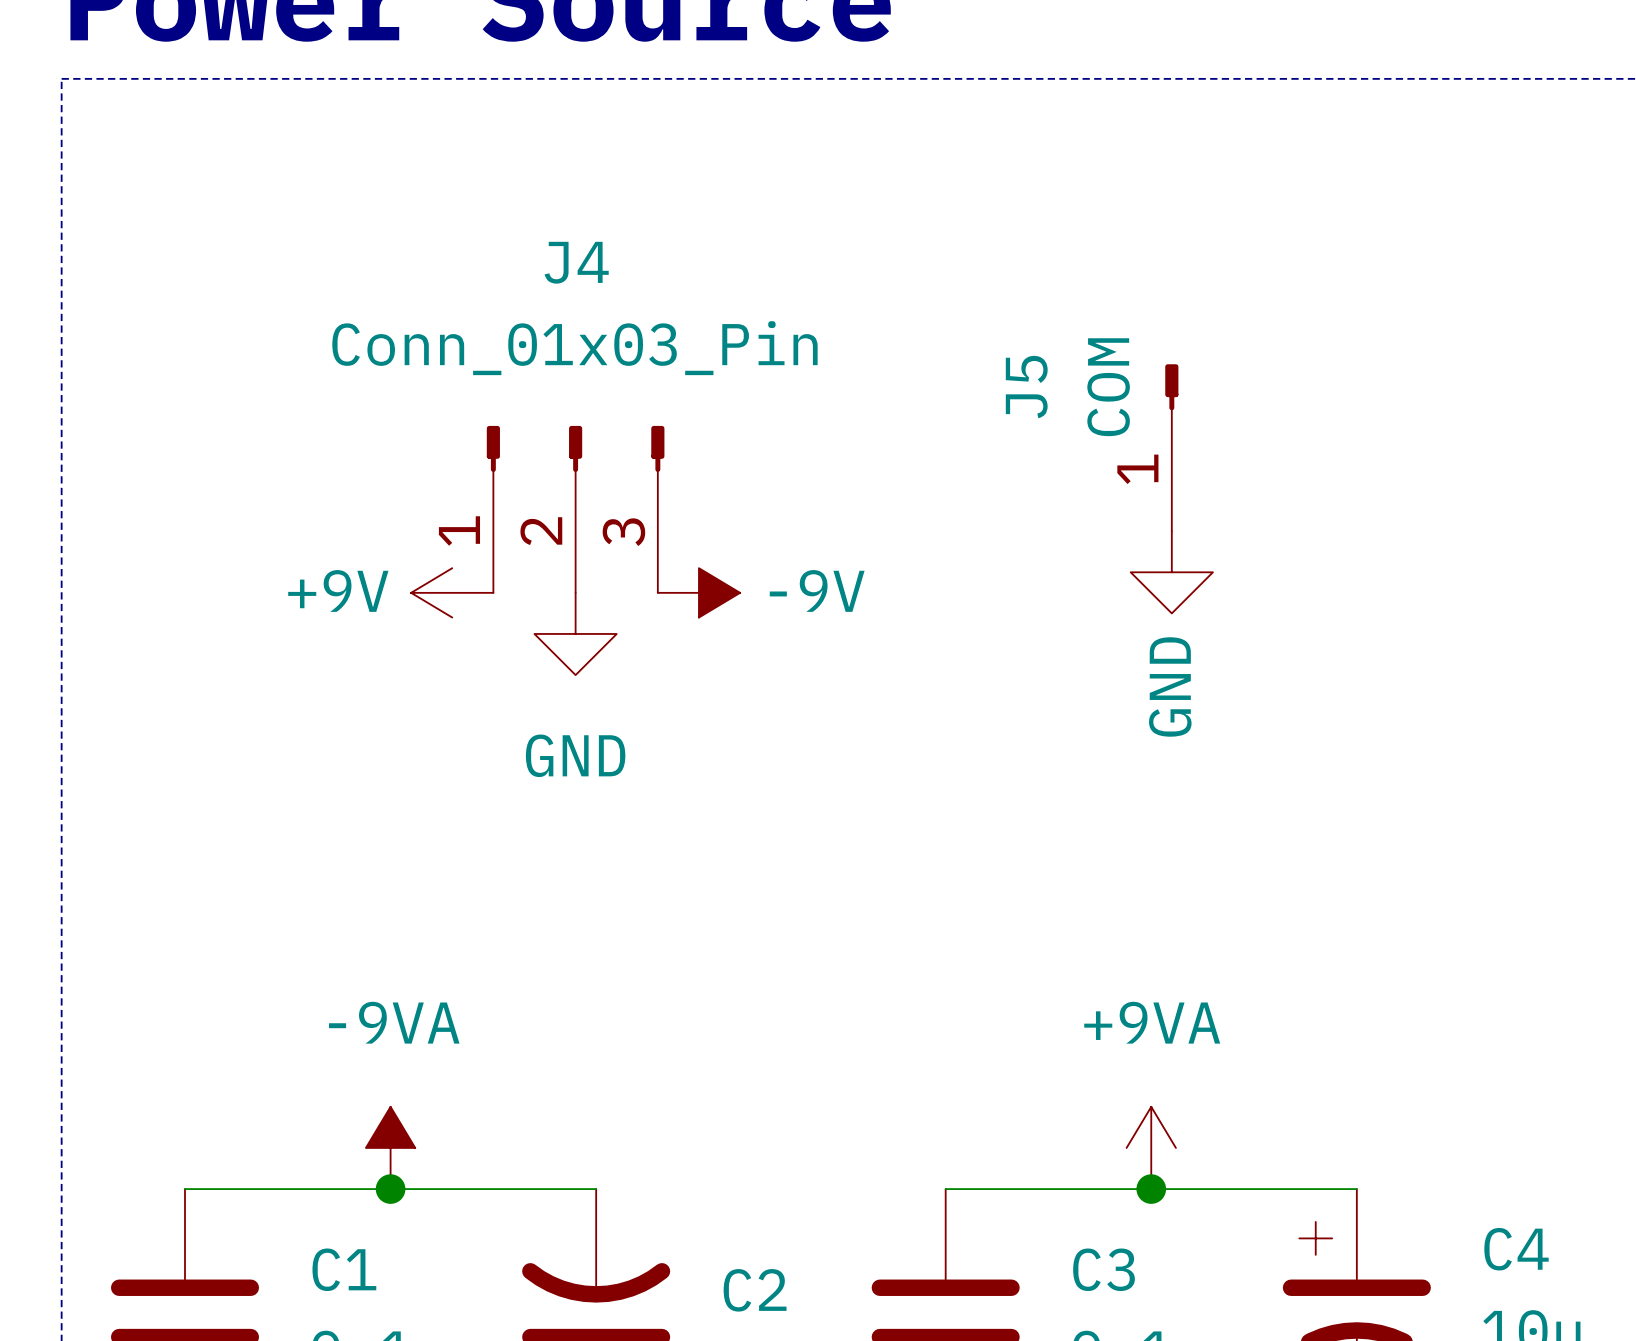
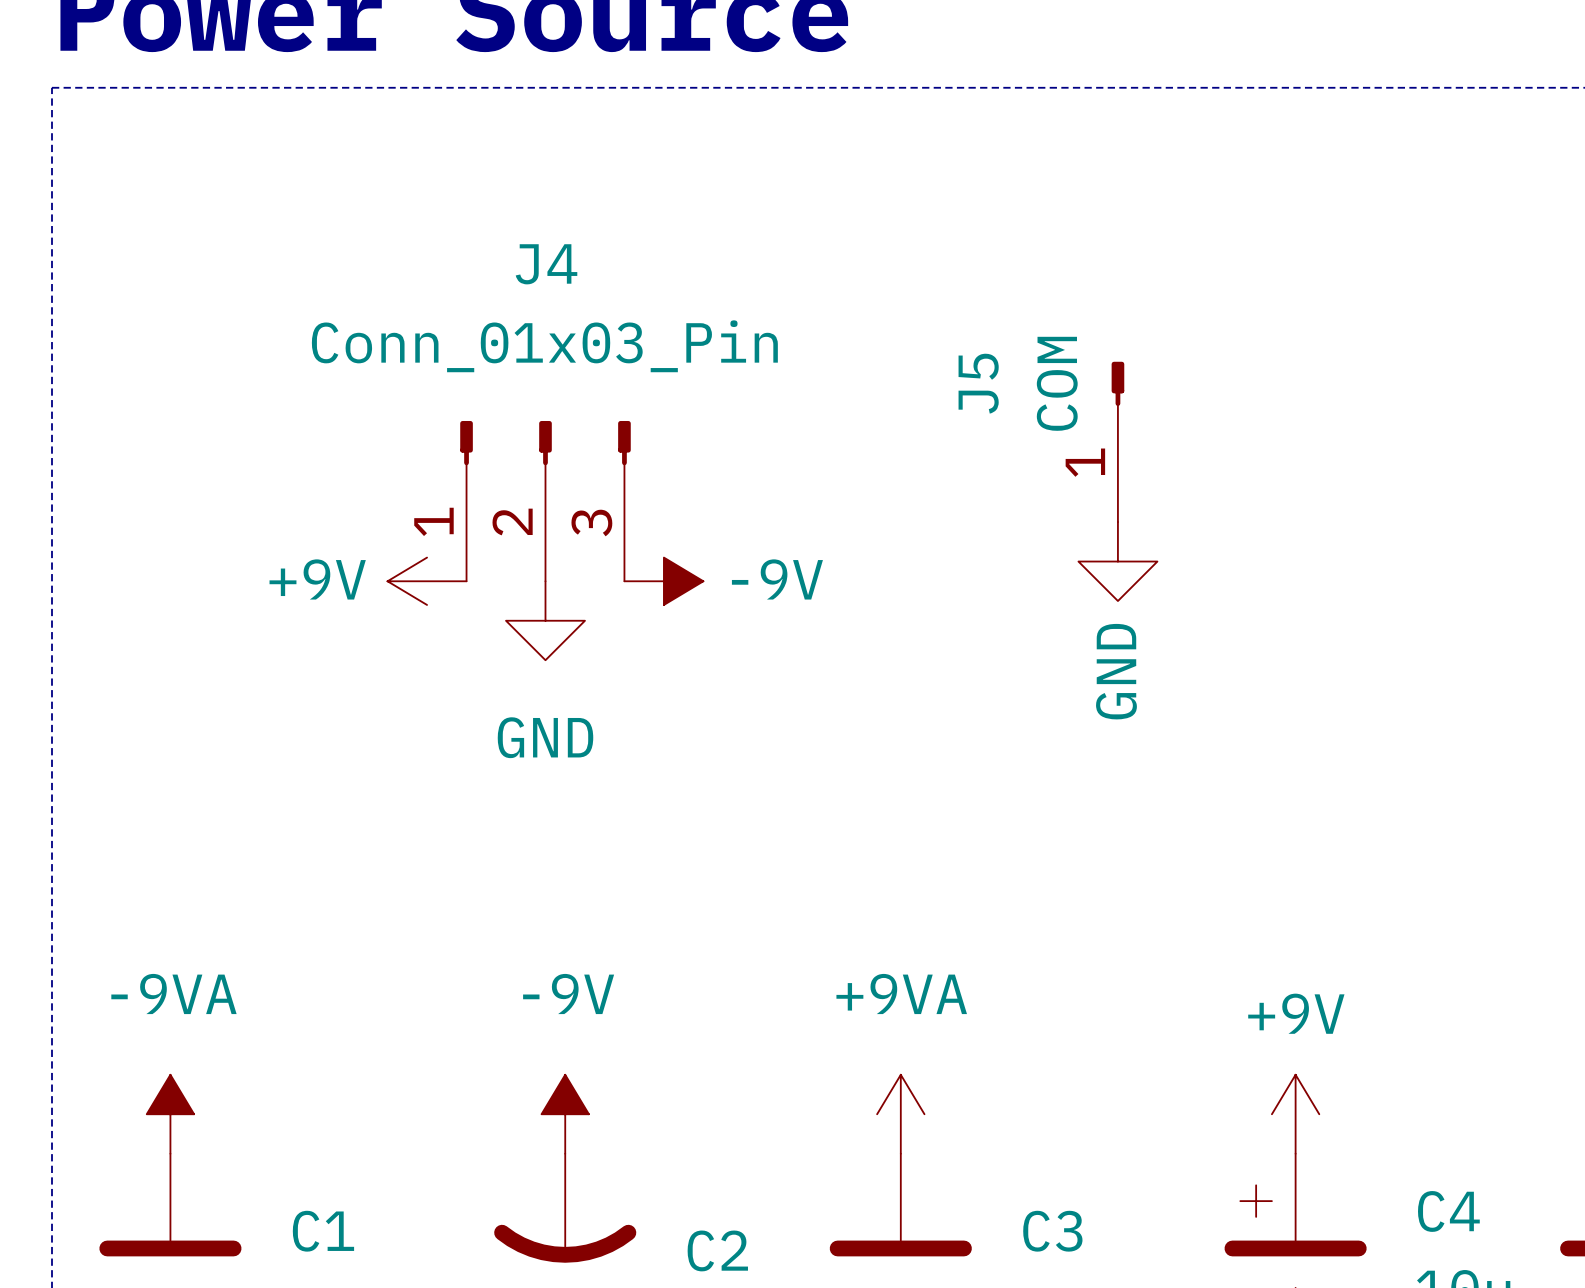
power symbol position: -9VA (390, 1147) -> -9VA (170, 1114)
power symbol: none -> -9V (565, 1114)
power symbol position: +9VA (1151, 1147) -> +9VA (900, 1114)
power symbol: none -> +9V (1295, 1114)
wire: (184, 1189) (596, 1189) -> none
junction: (390, 1189) -> none
wire: (945, 1189) (1356, 1189) -> none
junction: (1151, 1189) -> none

